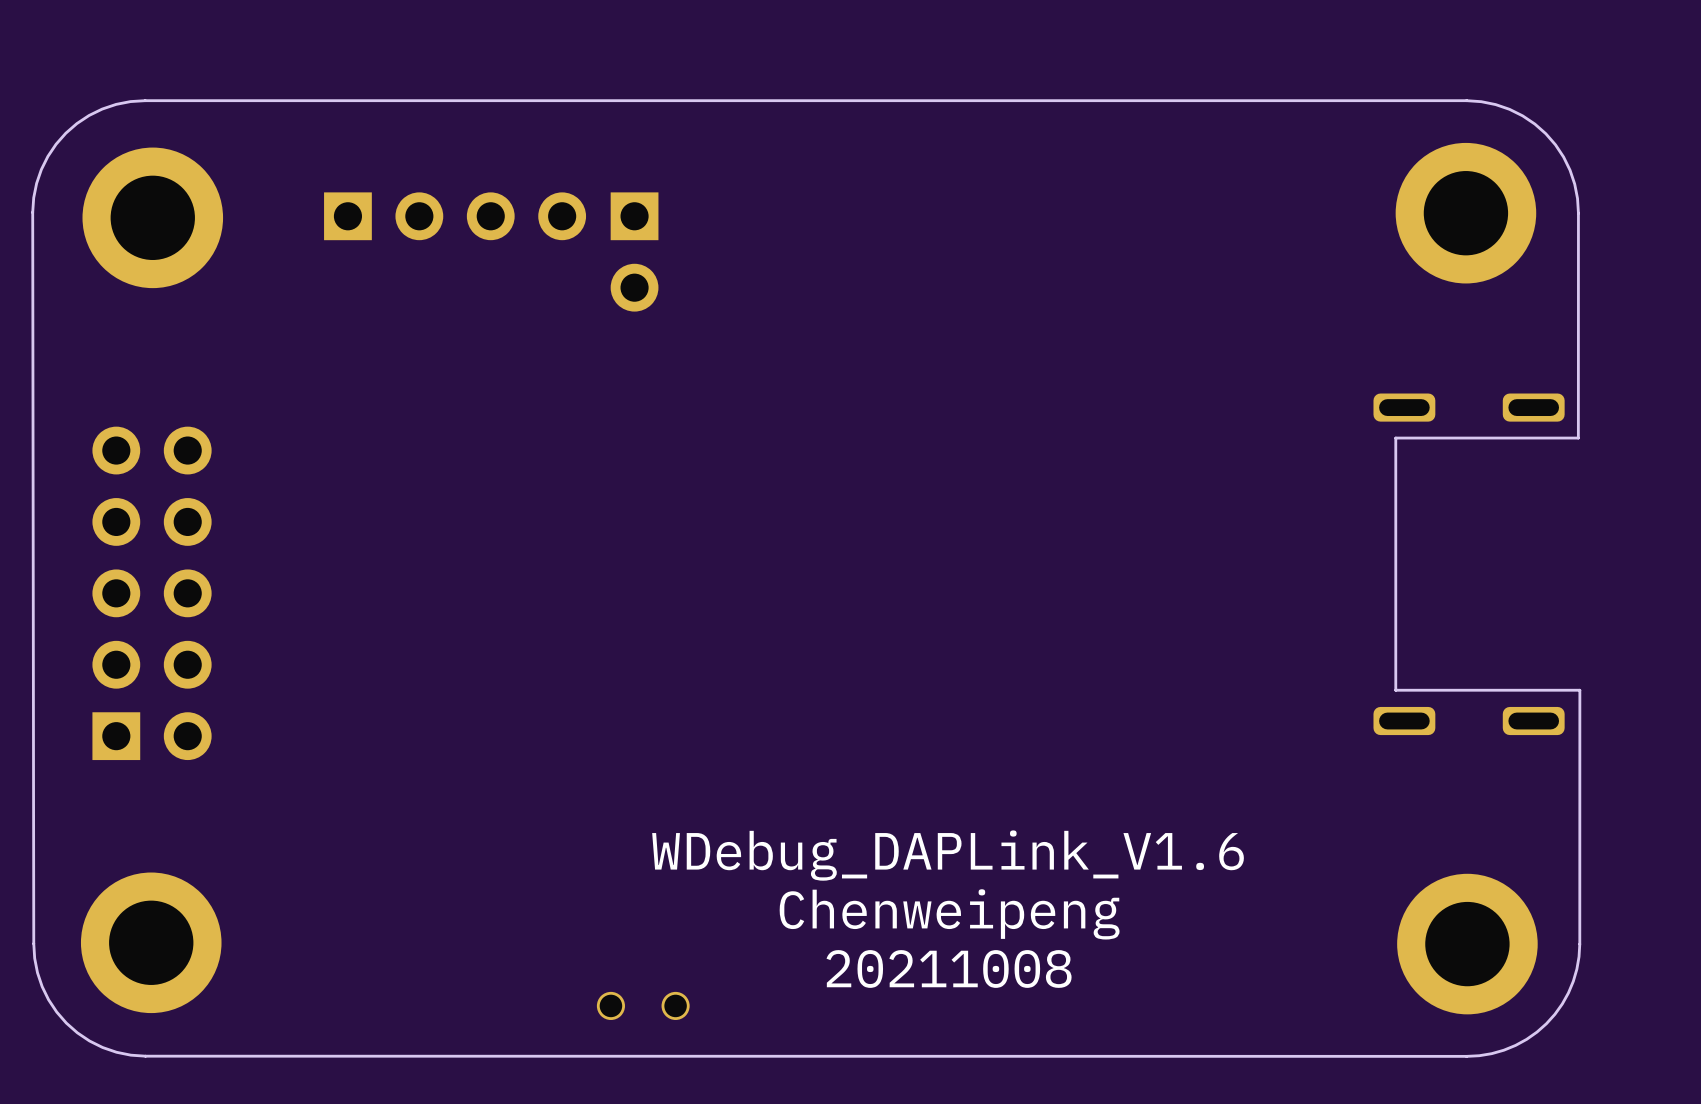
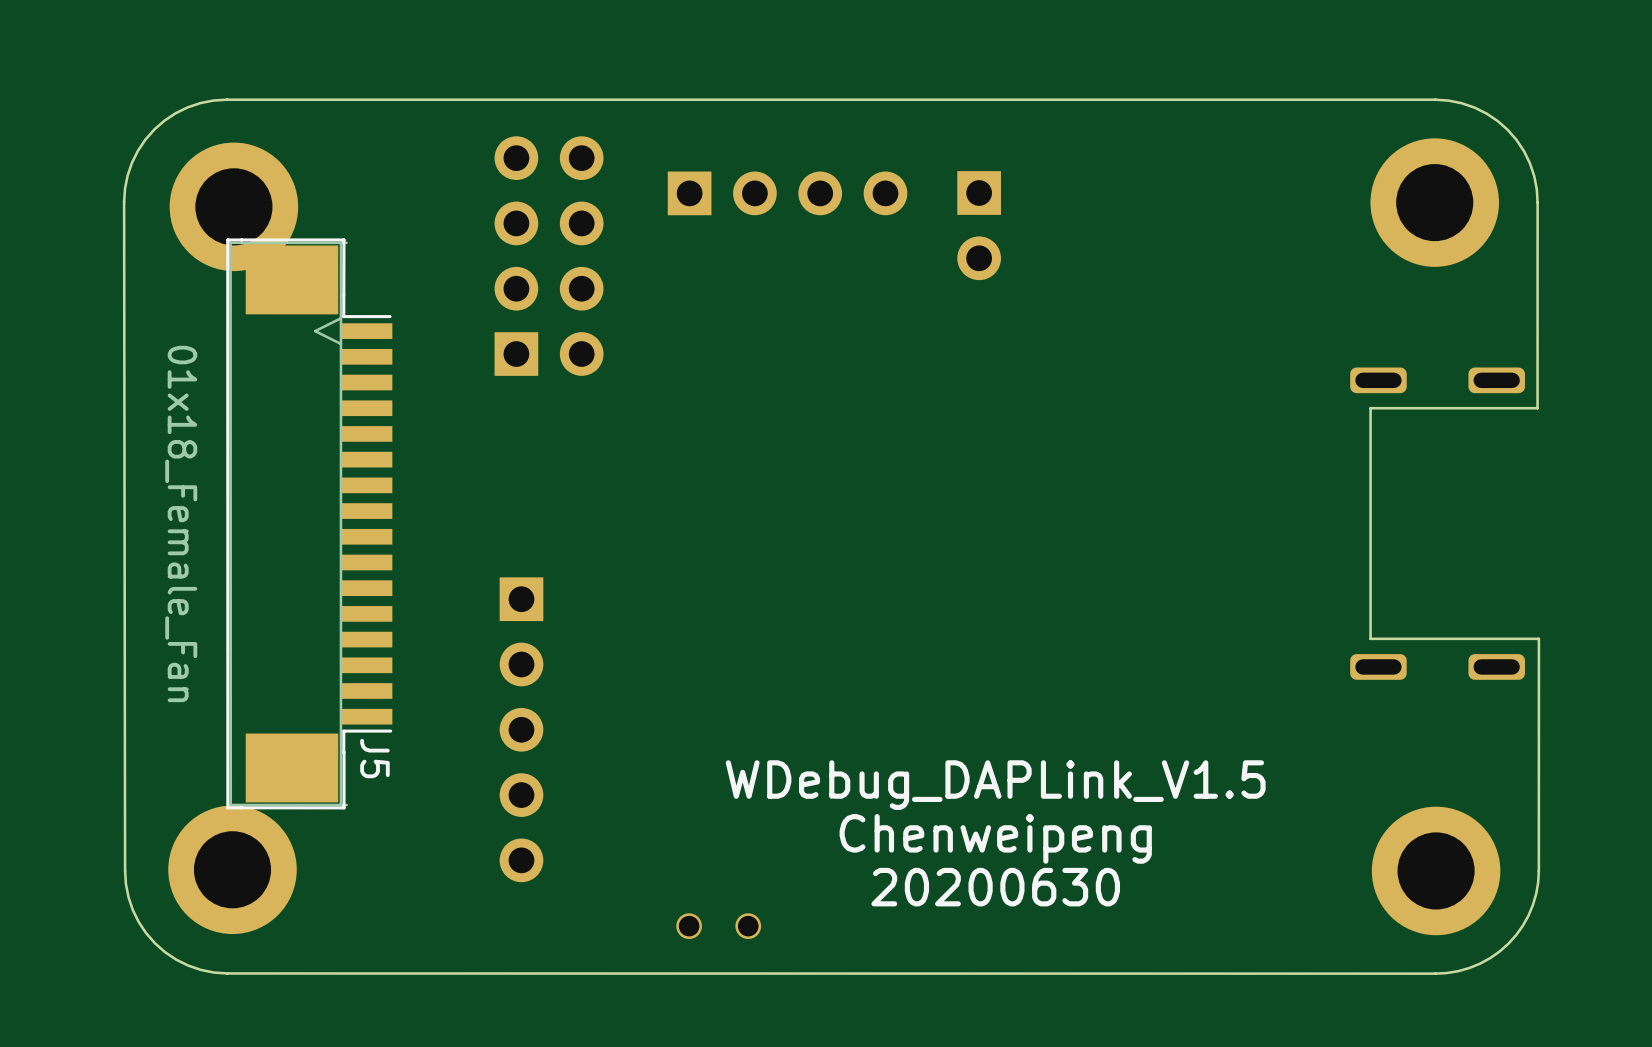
part position: (455, 216) -> (787, 193)
part position: (634, 251) -> (979, 225)
part: none -> (549, 256)
J5: none -> 01x18_Female_Fan (309, 523)
part: (152, 593) -> none
part: none -> (521, 729)
text: WDebug_DAPLink_V1.6 (948, 855) -> WDebug_DAPLink_V1.5 (995, 785)
text position: Chenweipeng (949, 914) -> Chenweipeng (995, 838)
text: 20211008 (949, 968) -> 20200630 (995, 887)
part position: (643, 1005) -> (718, 926)

